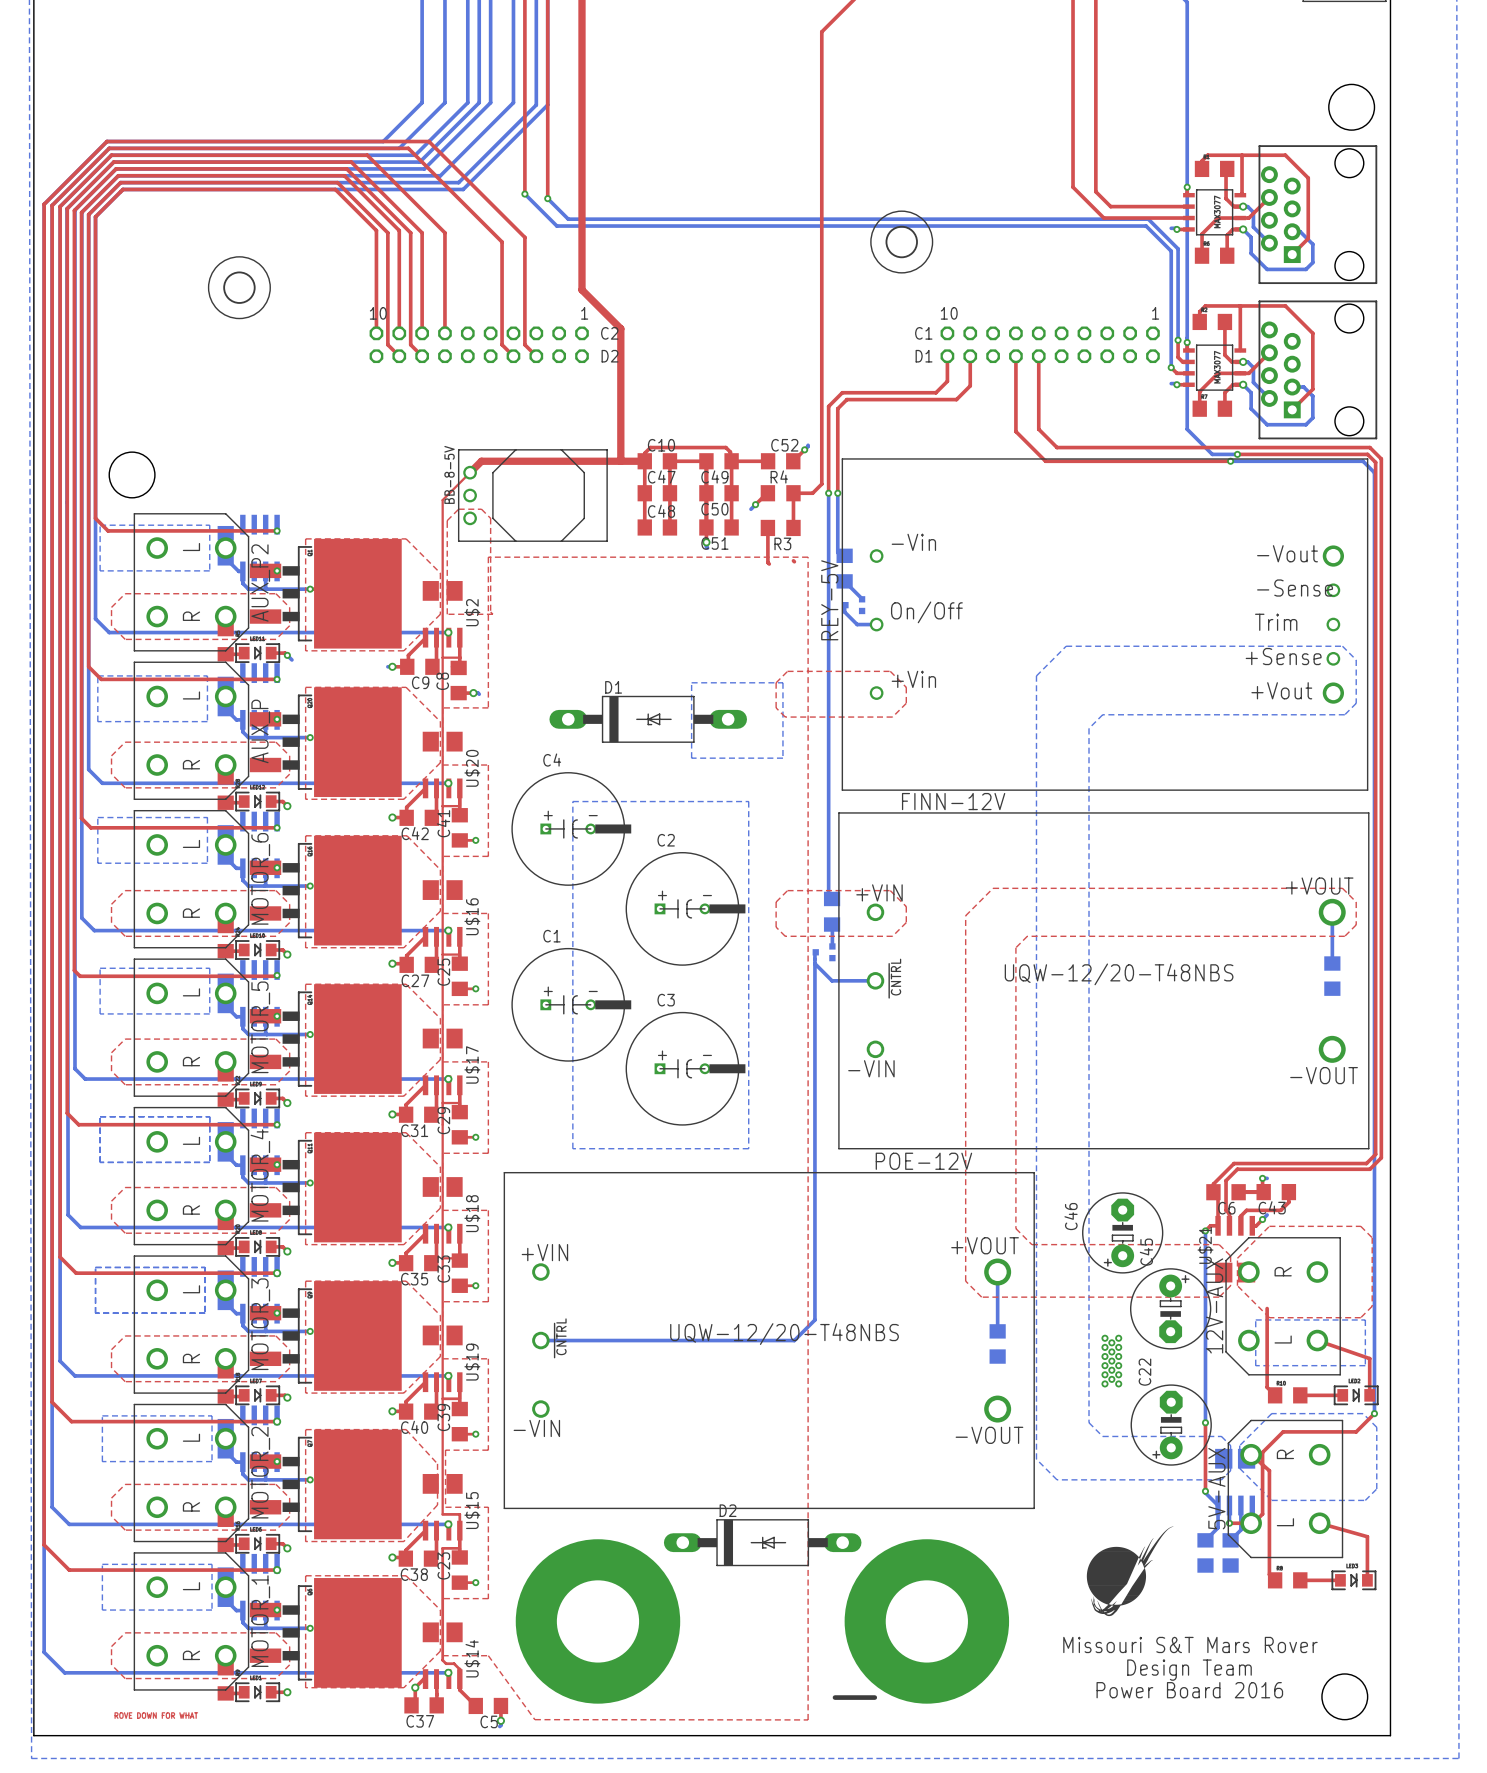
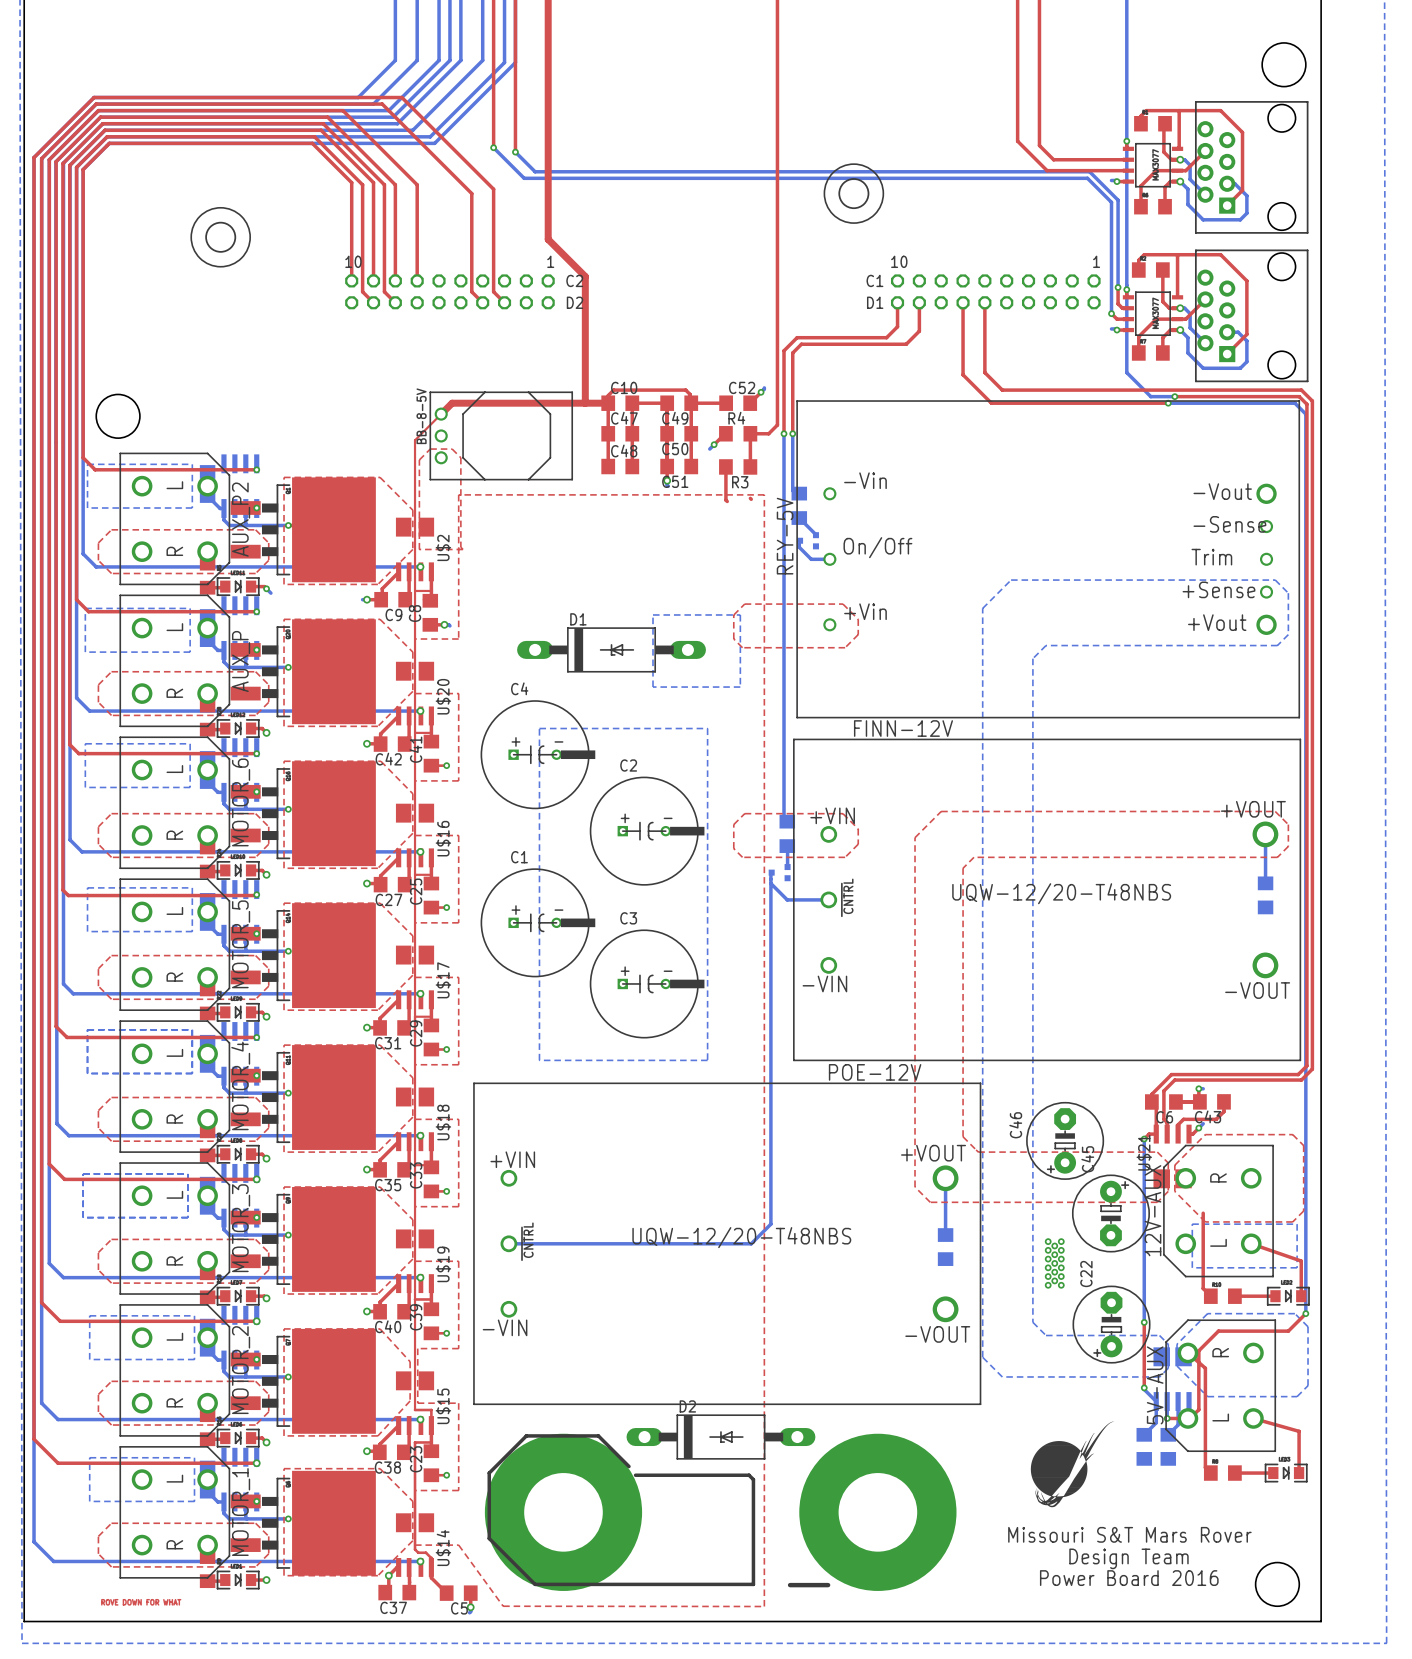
line: none -> (628, 1466) (598, 1435) (526, 1435) (489, 1473) (489, 1538) (535, 1584) (753, 1584) (753, 1479) (749, 1475) (635, 1475)

